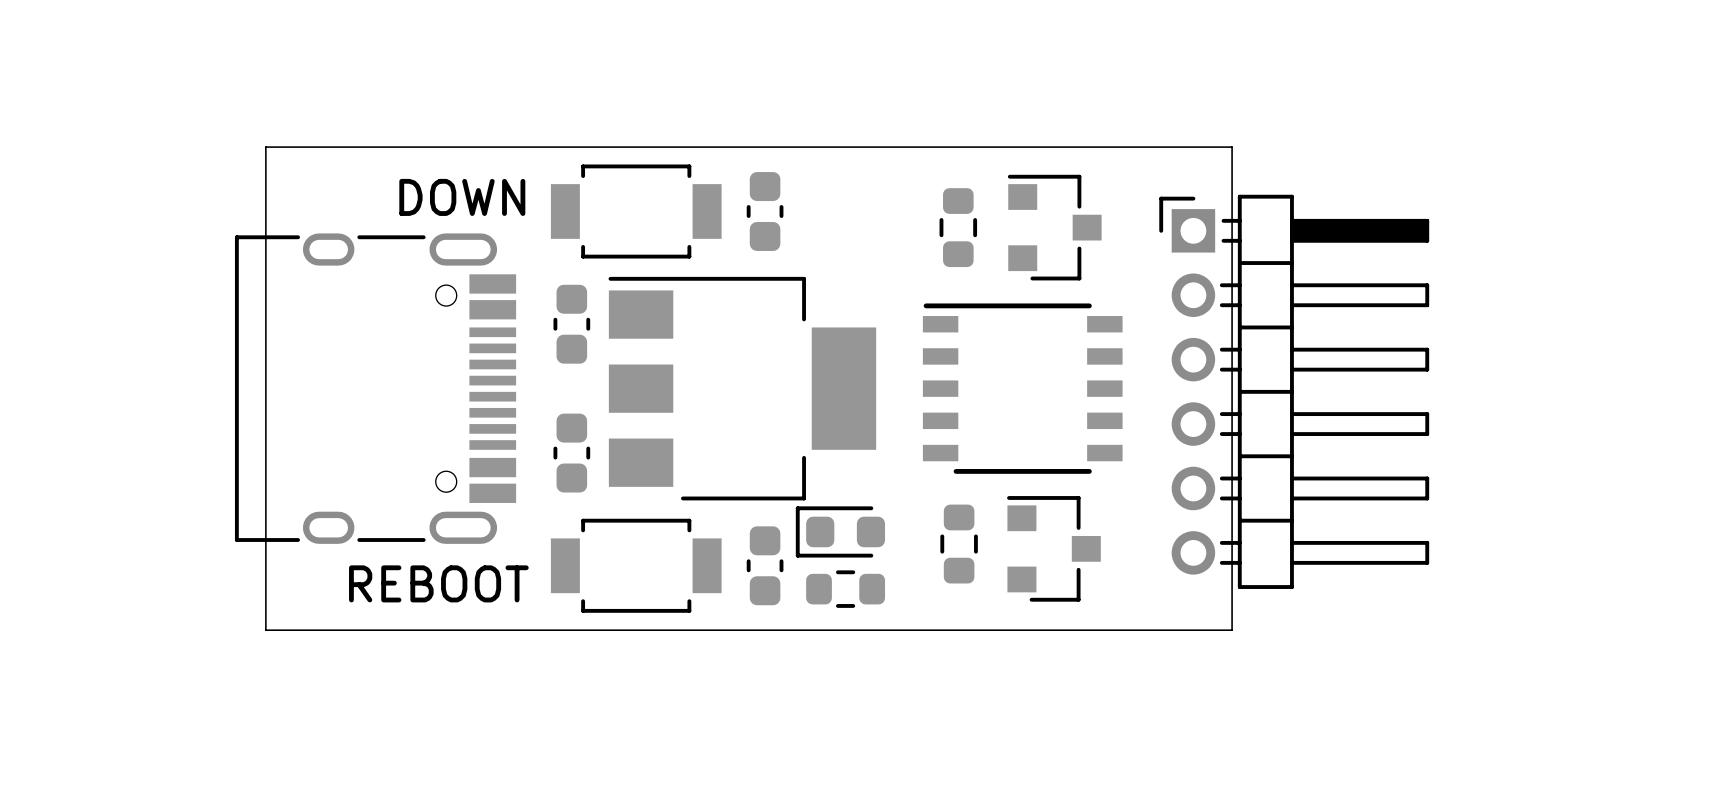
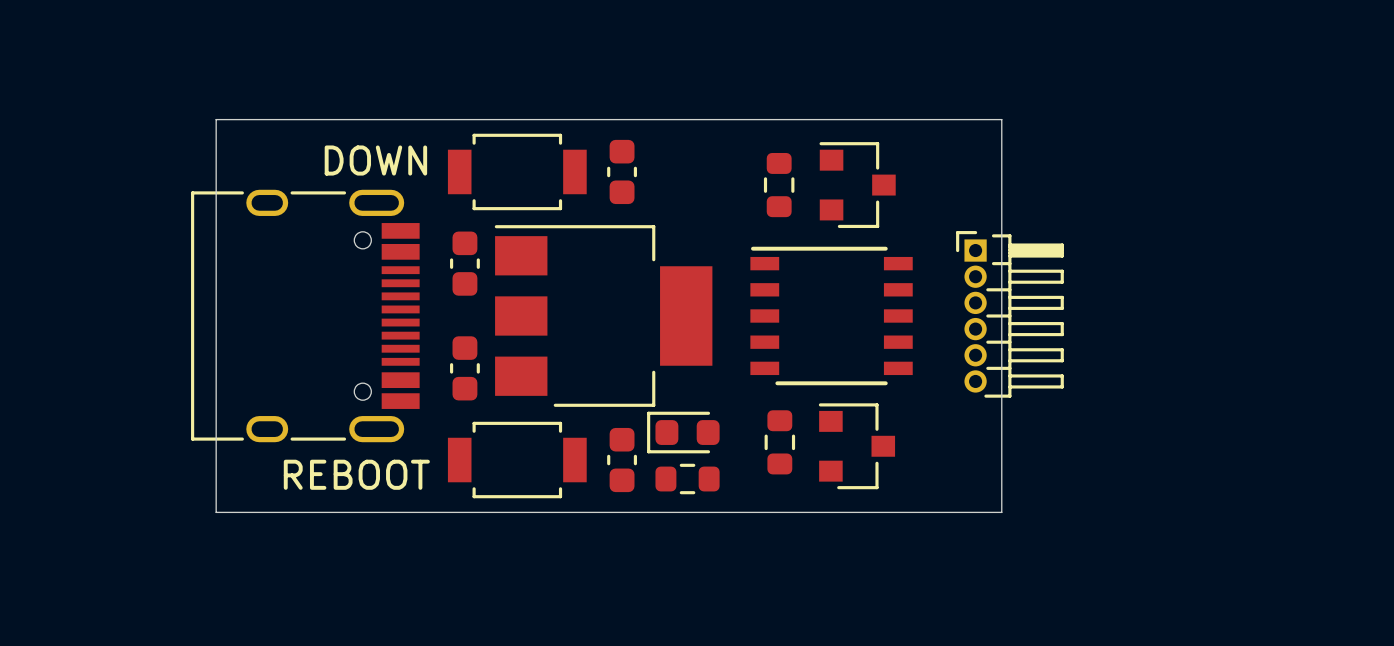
part: none -> (1009, 314)
part: (1294, 391) -> none

